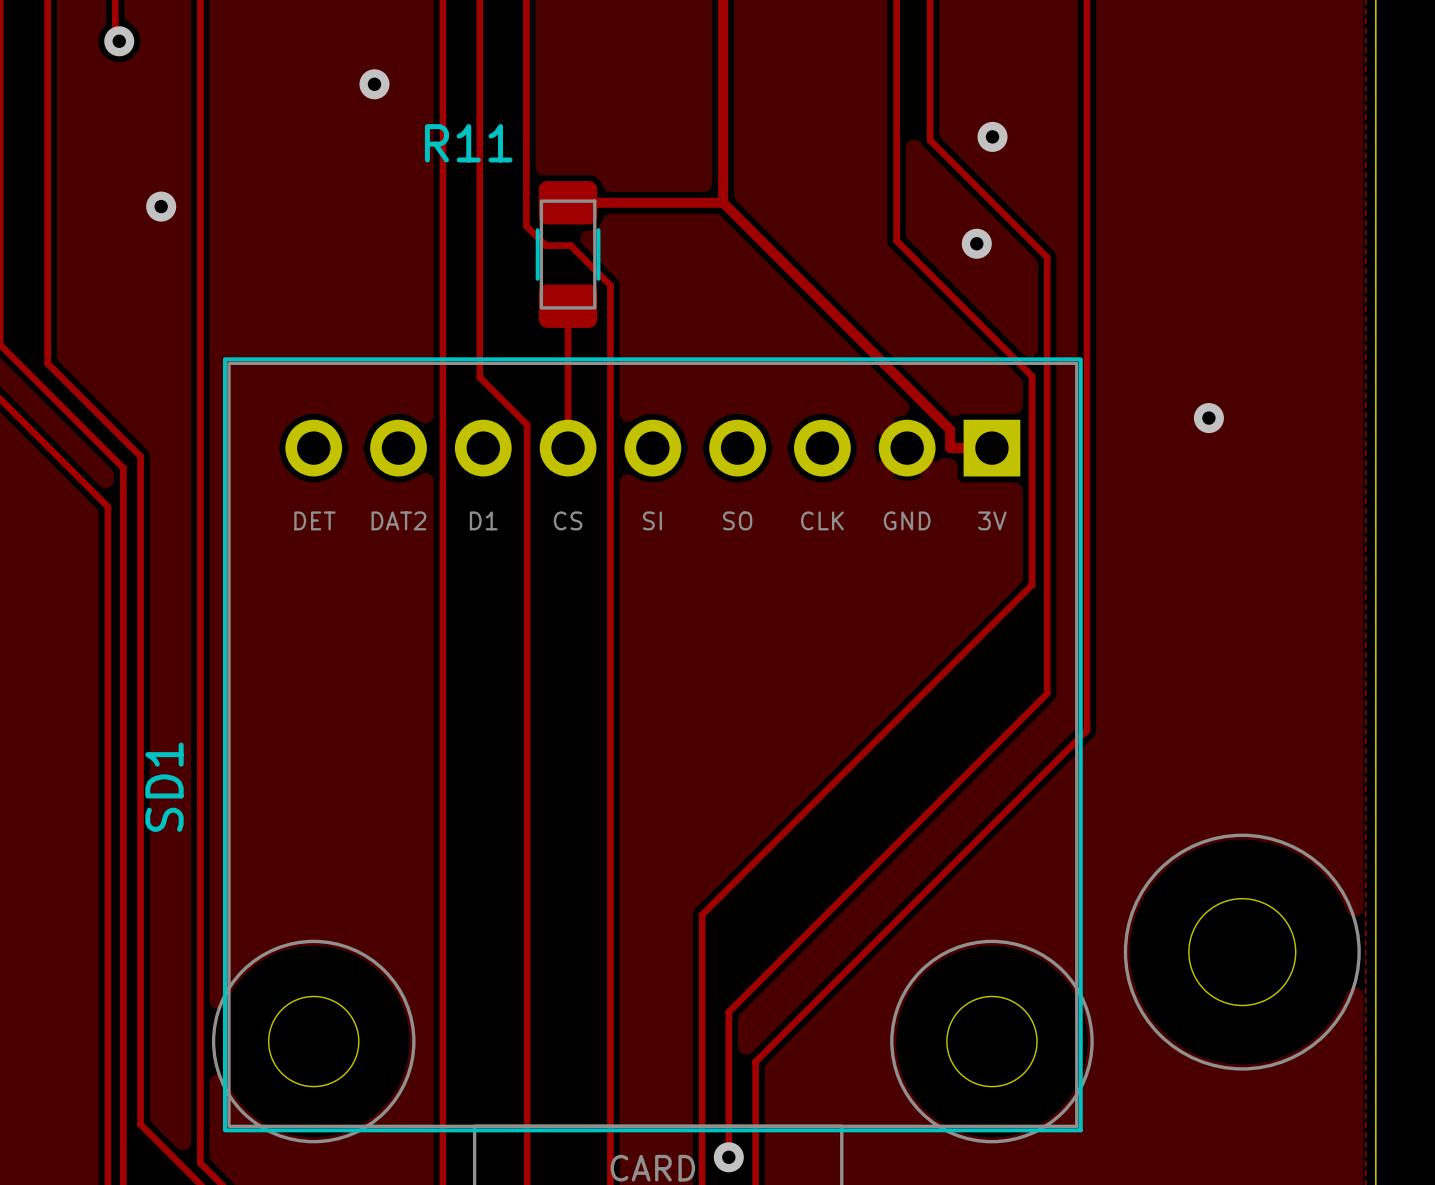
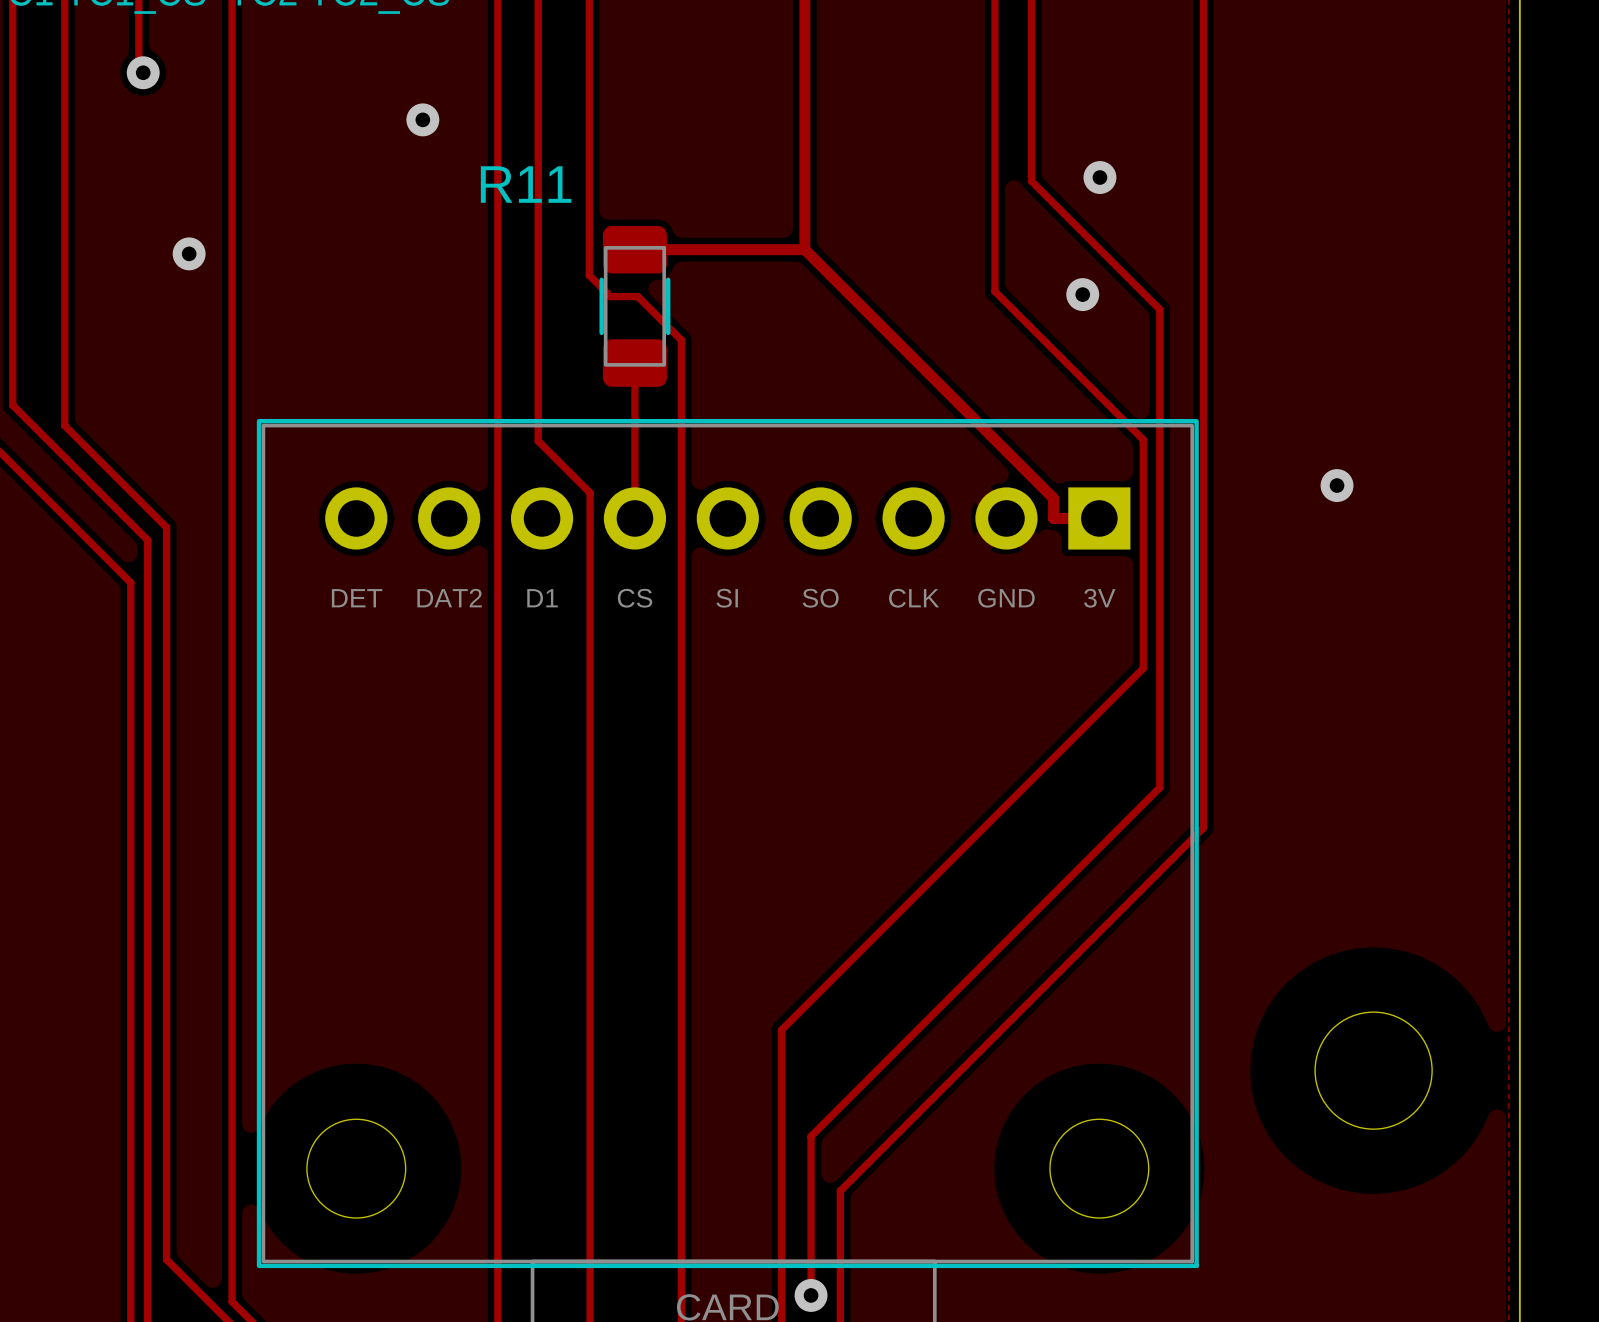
SD1 name: SD1 (164, 787) -> none
drawing: [890, 833, 1361, 1144] -> none
drawing: [211, 939, 416, 1144] -> none

